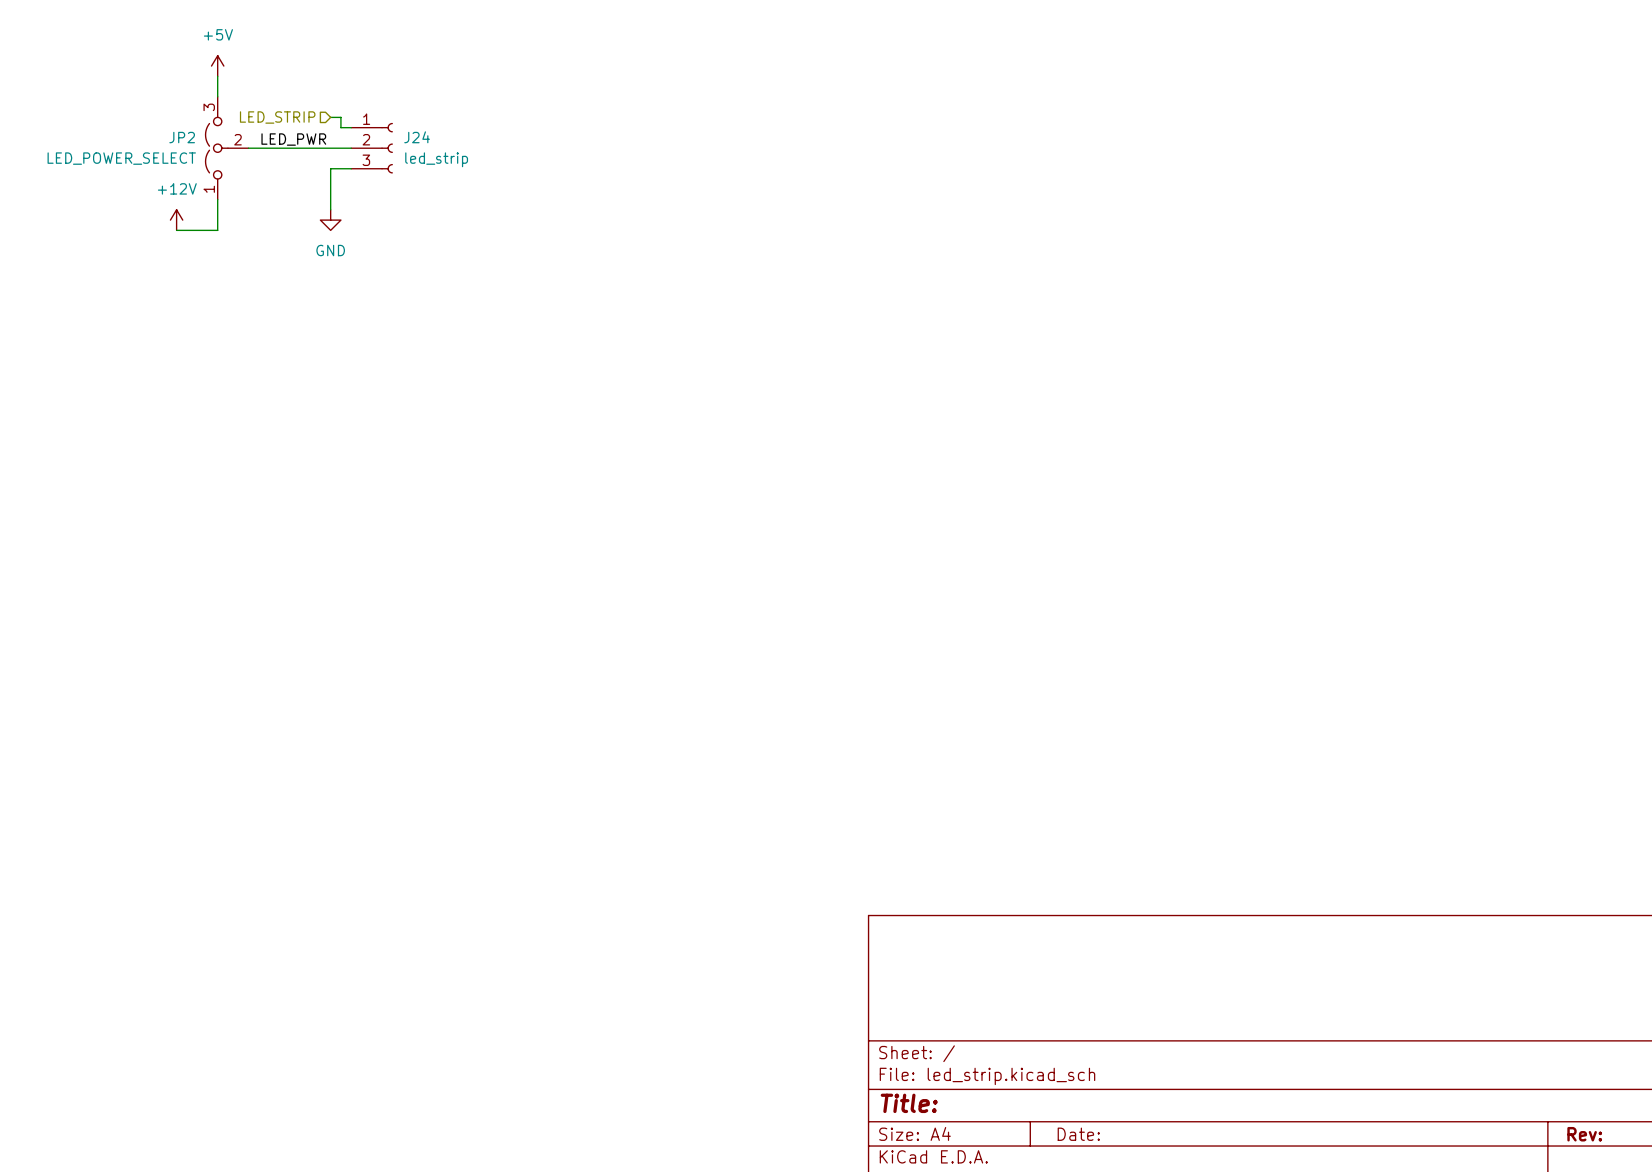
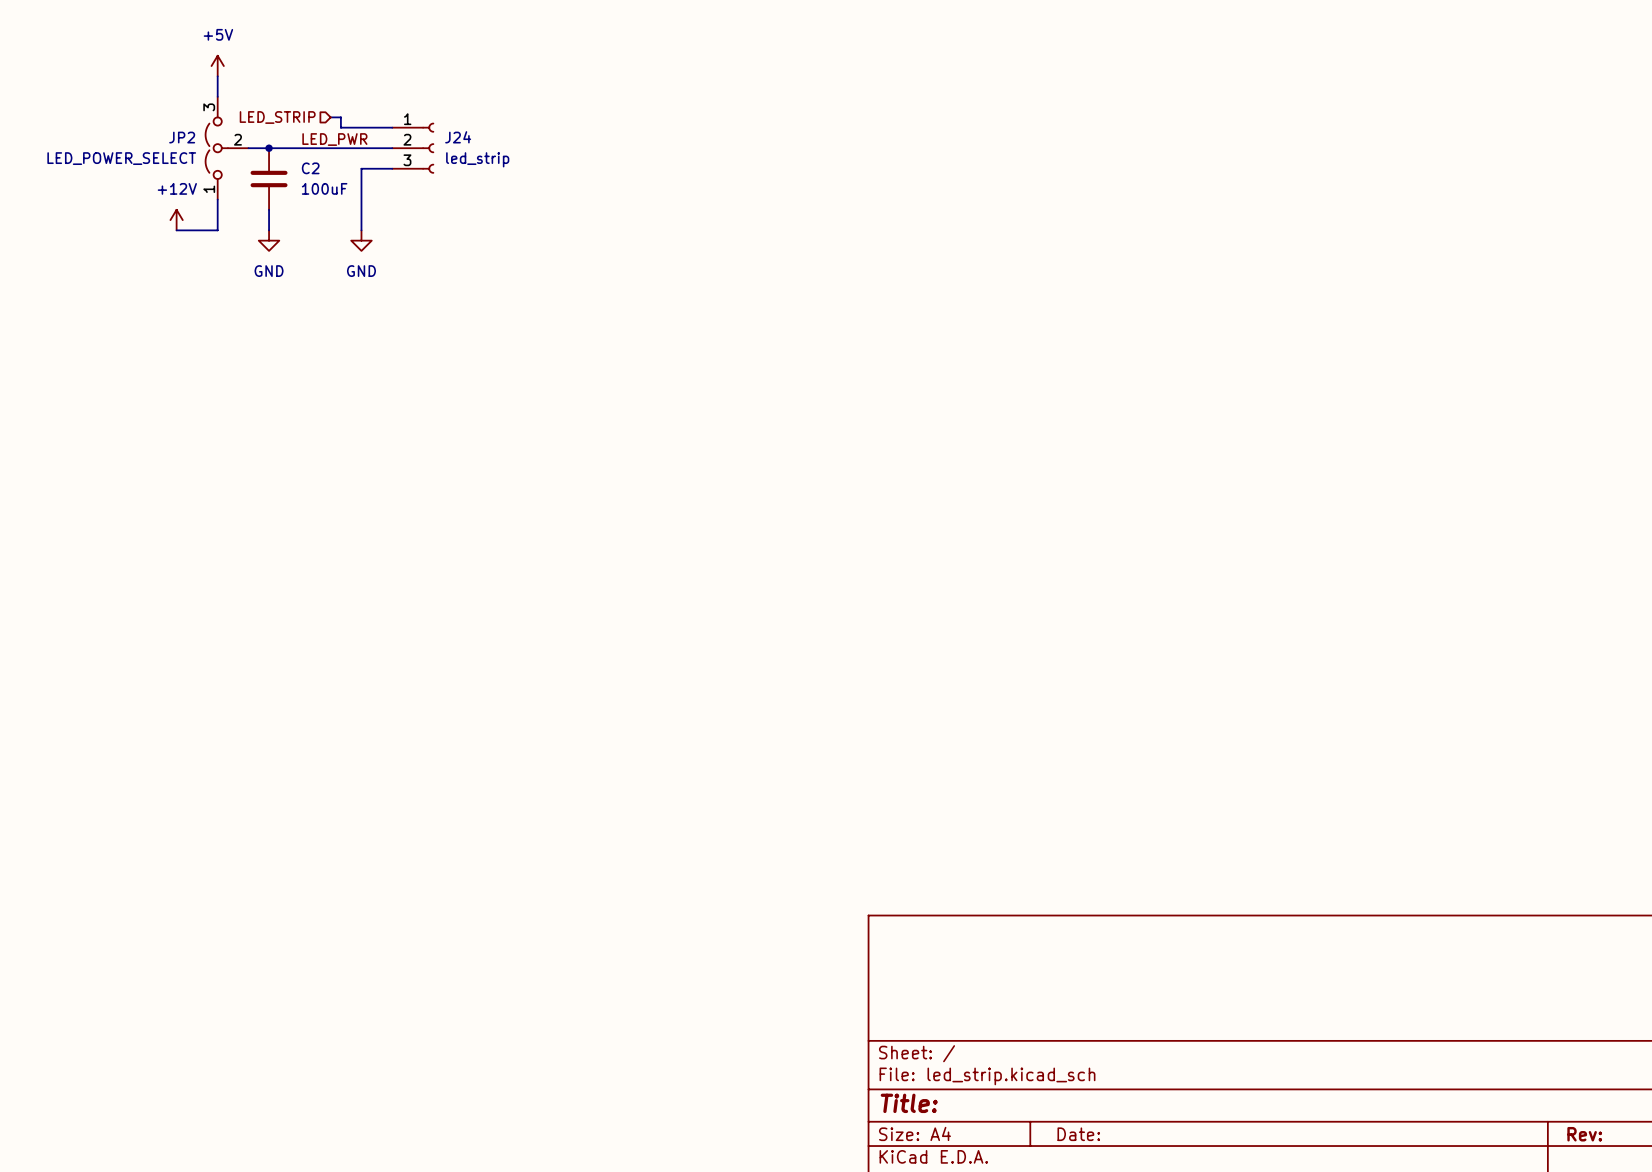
label position: LED_PWR (293, 139) -> LED_PWR (334, 139)
junction: none -> (269, 148)
J24 position: (372, 148) -> (413, 148)
wire: (351, 168) (330, 168) (330, 209) -> none
wire: none -> (392, 168) (361, 168) (361, 230)
C2: none -> 100uF (269, 179)
wire: none -> (269, 209) (269, 230)
power symbol: GND (330, 220) -> none
power symbol: none -> GND (269, 240)
power symbol: none -> GND (361, 240)

